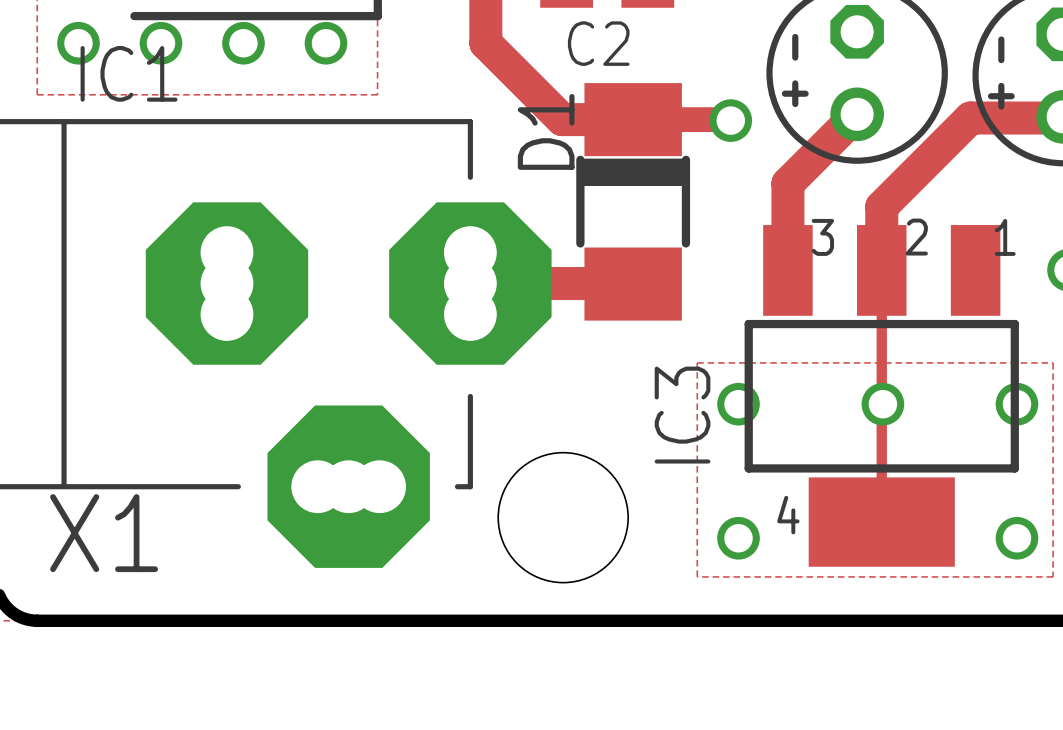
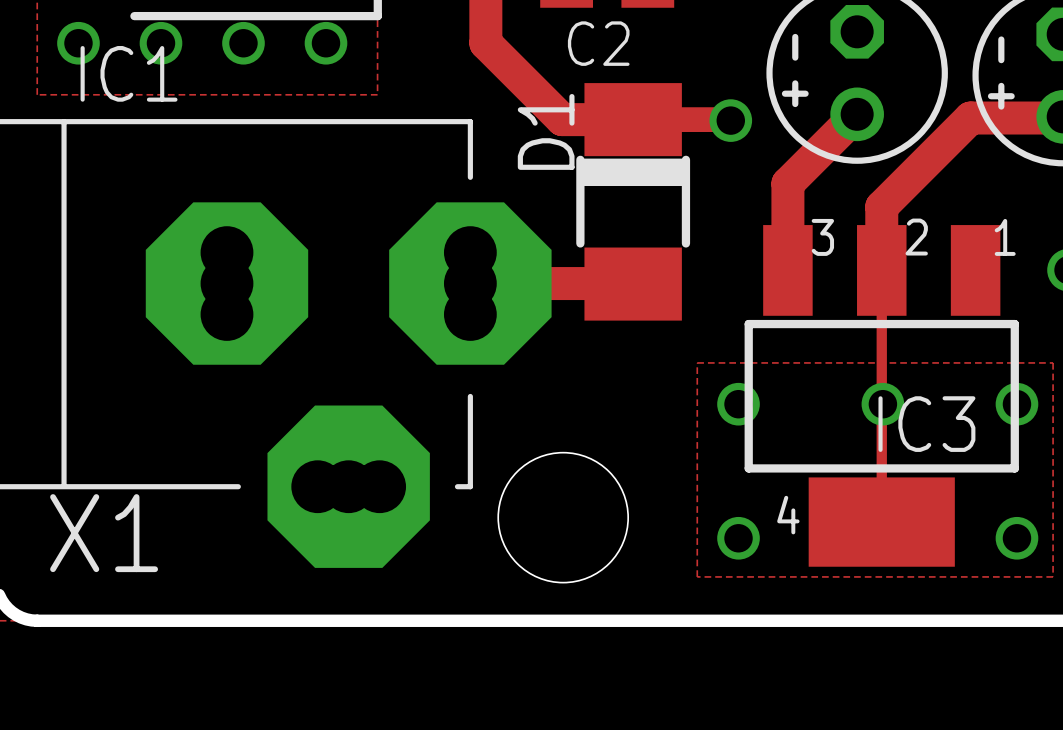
IC3 name rotation: 0° (682, 415) -> 90° clockwise (926, 424)
IC3 name position: IC3 (682, 415) -> IC3 (926, 424)

